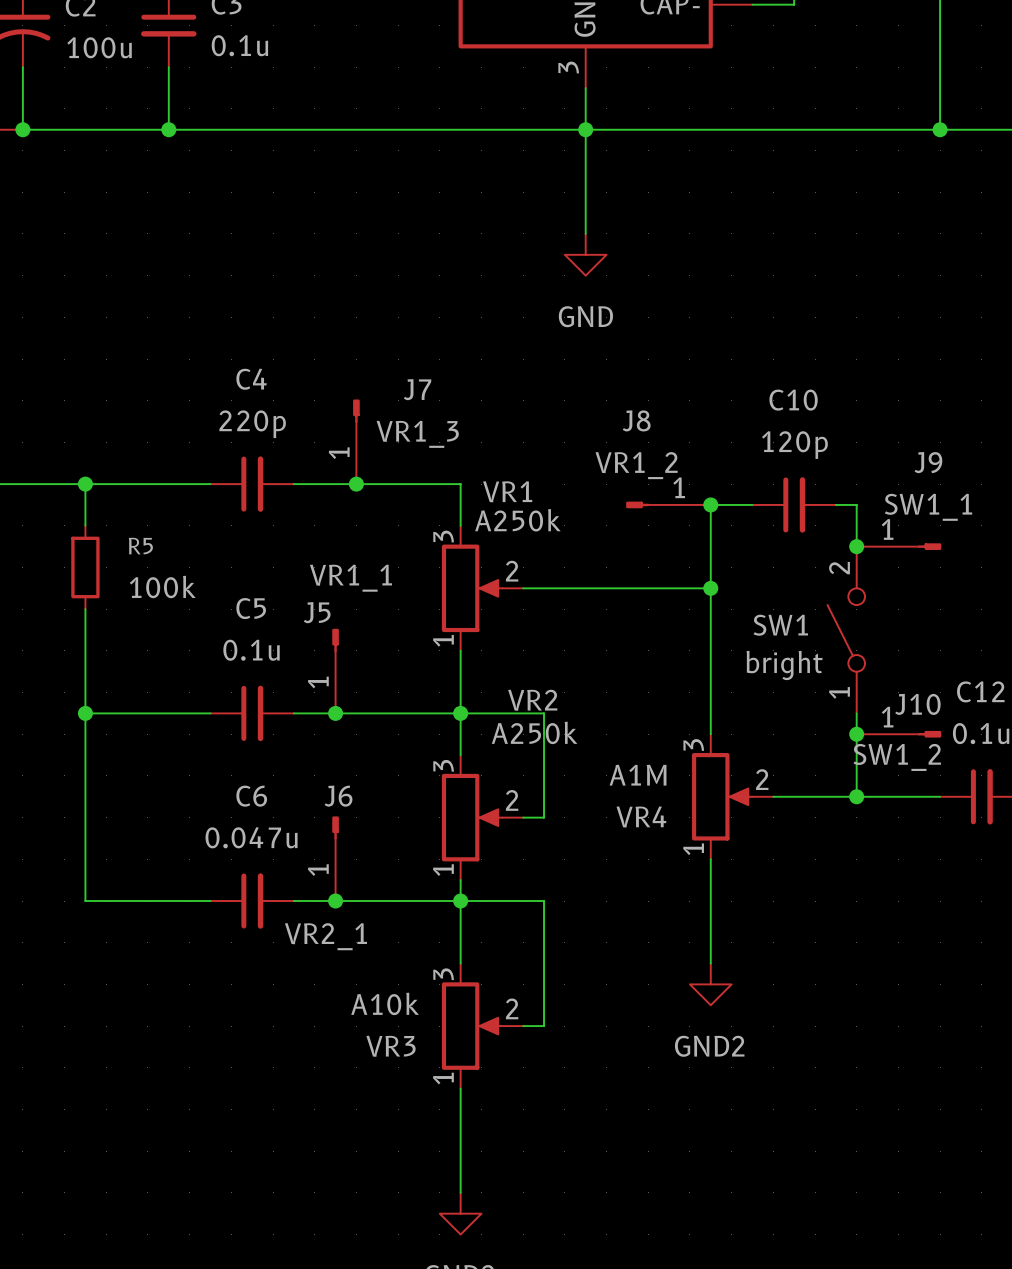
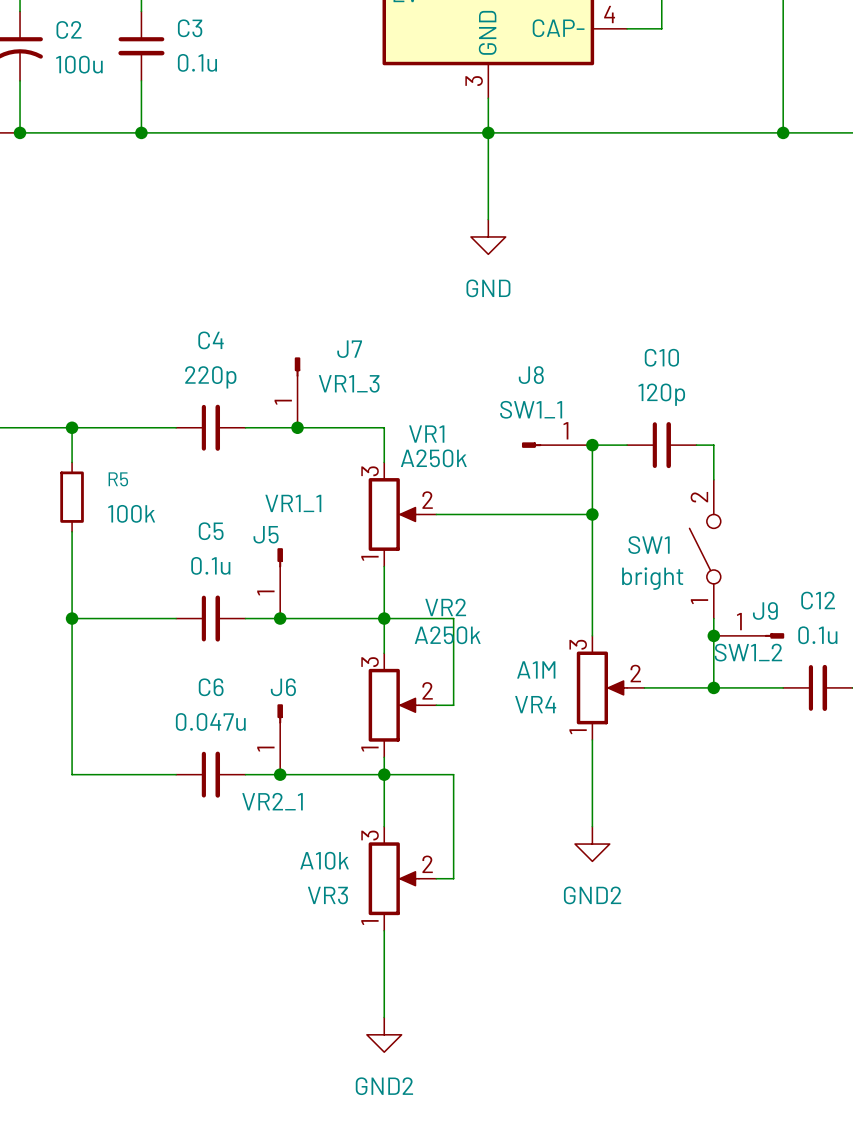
J8 value: VR1_2 (636, 465) -> SW1_1 (531, 409)
junction: (856, 546) -> none
J9: SW1_1 (899, 546) -> none
J10 name: J10 (917, 704) -> J9 (765, 610)

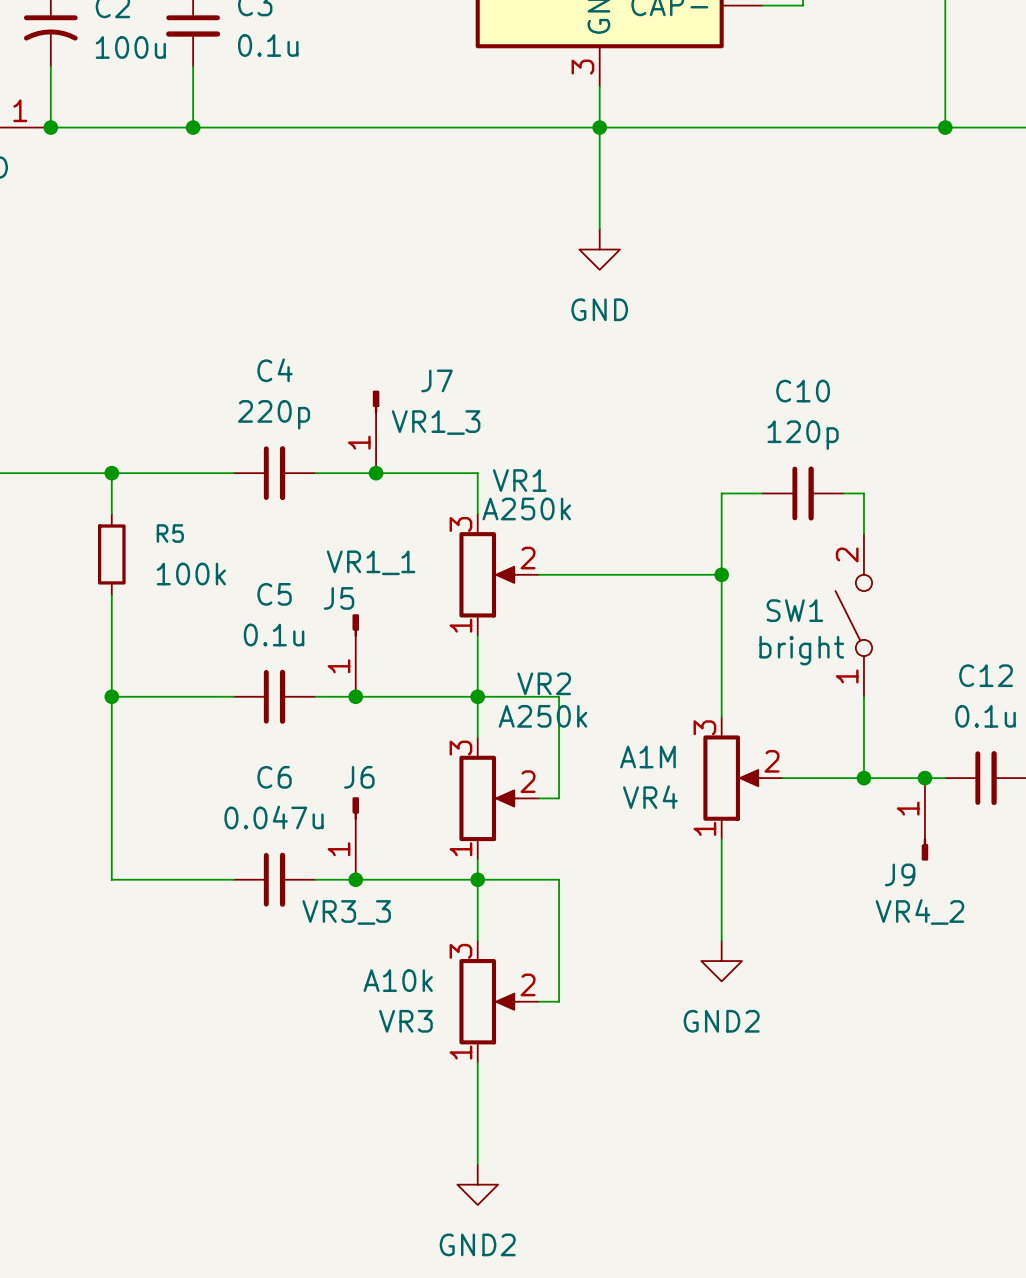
J8: SW1_1 (557, 445) -> none
junction: (592, 445) -> none
J9 name position: J9 (765, 610) -> J9 (900, 874)
junction position: (713, 635) -> (924, 778)
J9 position: (749, 635) -> (924, 819)
J9 rotation: 0° (774, 635) -> 90° clockwise (924, 849)
J9 value: SW1_2 (748, 652) -> VR4_2 (919, 911)
J6 value: VR2_1 (272, 801) -> VR3_3 (346, 912)

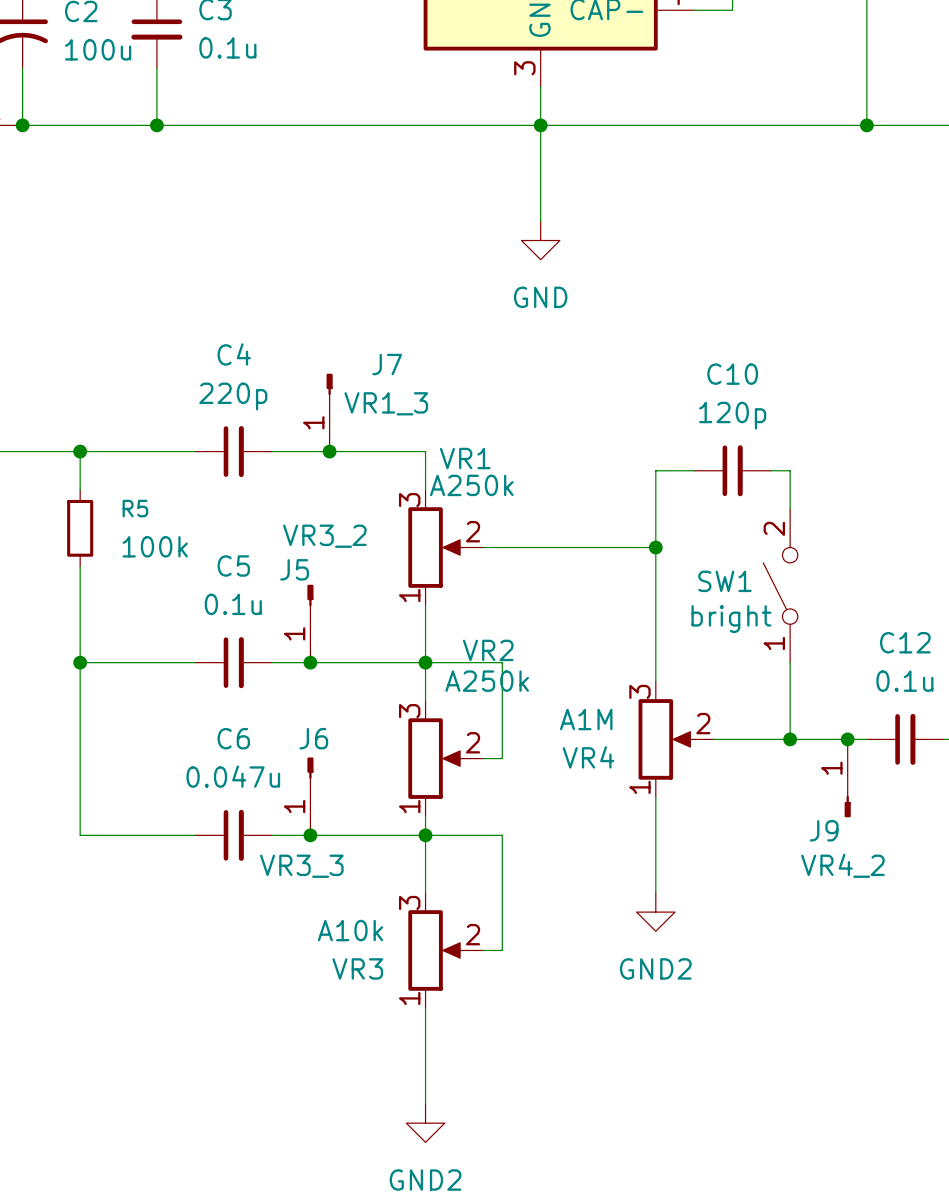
J5 value: VR1_1 (371, 562) -> VR3_2 (324, 536)

